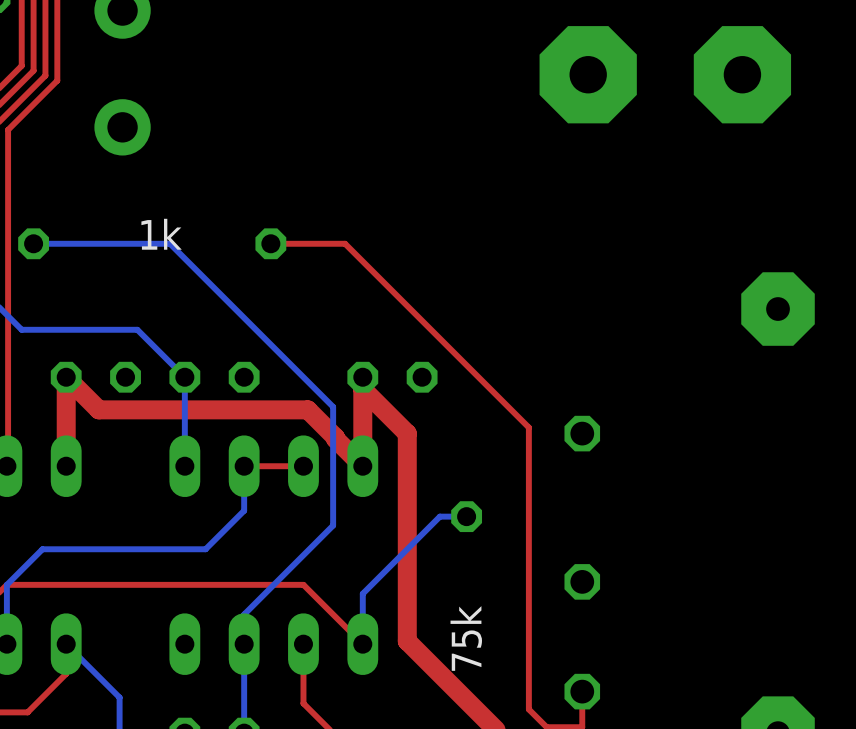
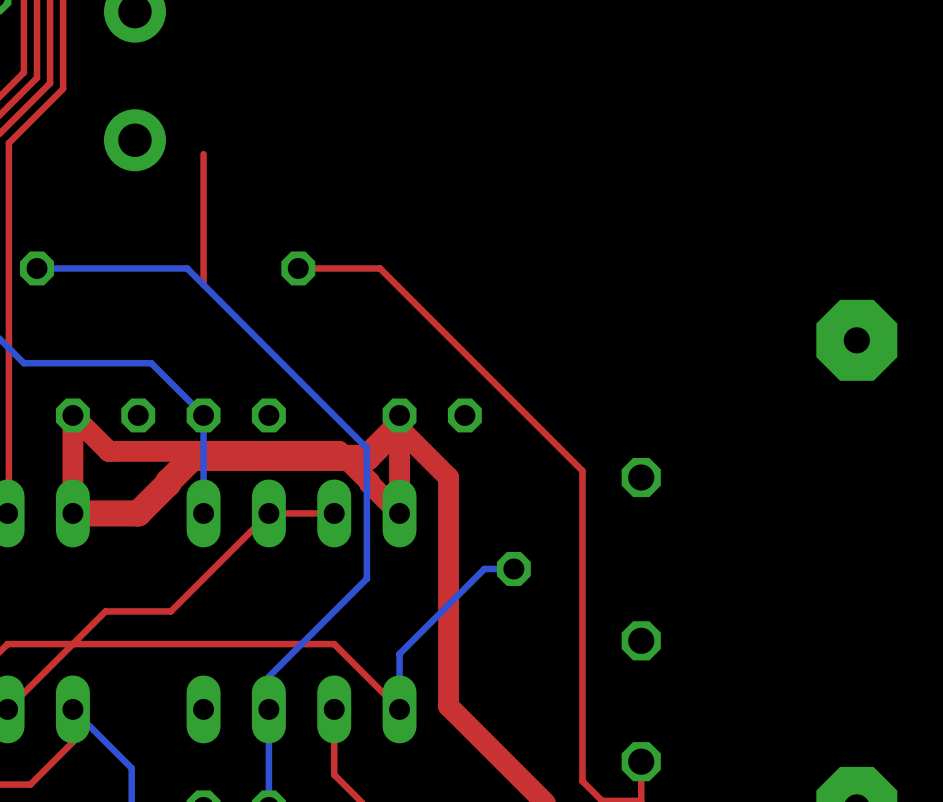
part: (588, 74) -> none
part: (742, 74) -> none
top track: none -> (203, 154) (203, 284)
text: 1k (161, 234) -> none
top track: none -> (399, 425) (366, 457) (192, 457) (138, 513) (72, 513)
top track: none -> (268, 513) (170, 611) (105, 611) (7, 709)
bottom track: (244, 466) (244, 510) (205, 549) (42, 549) (6, 584) (6, 644) -> none
text: 75k (466, 638) -> none

